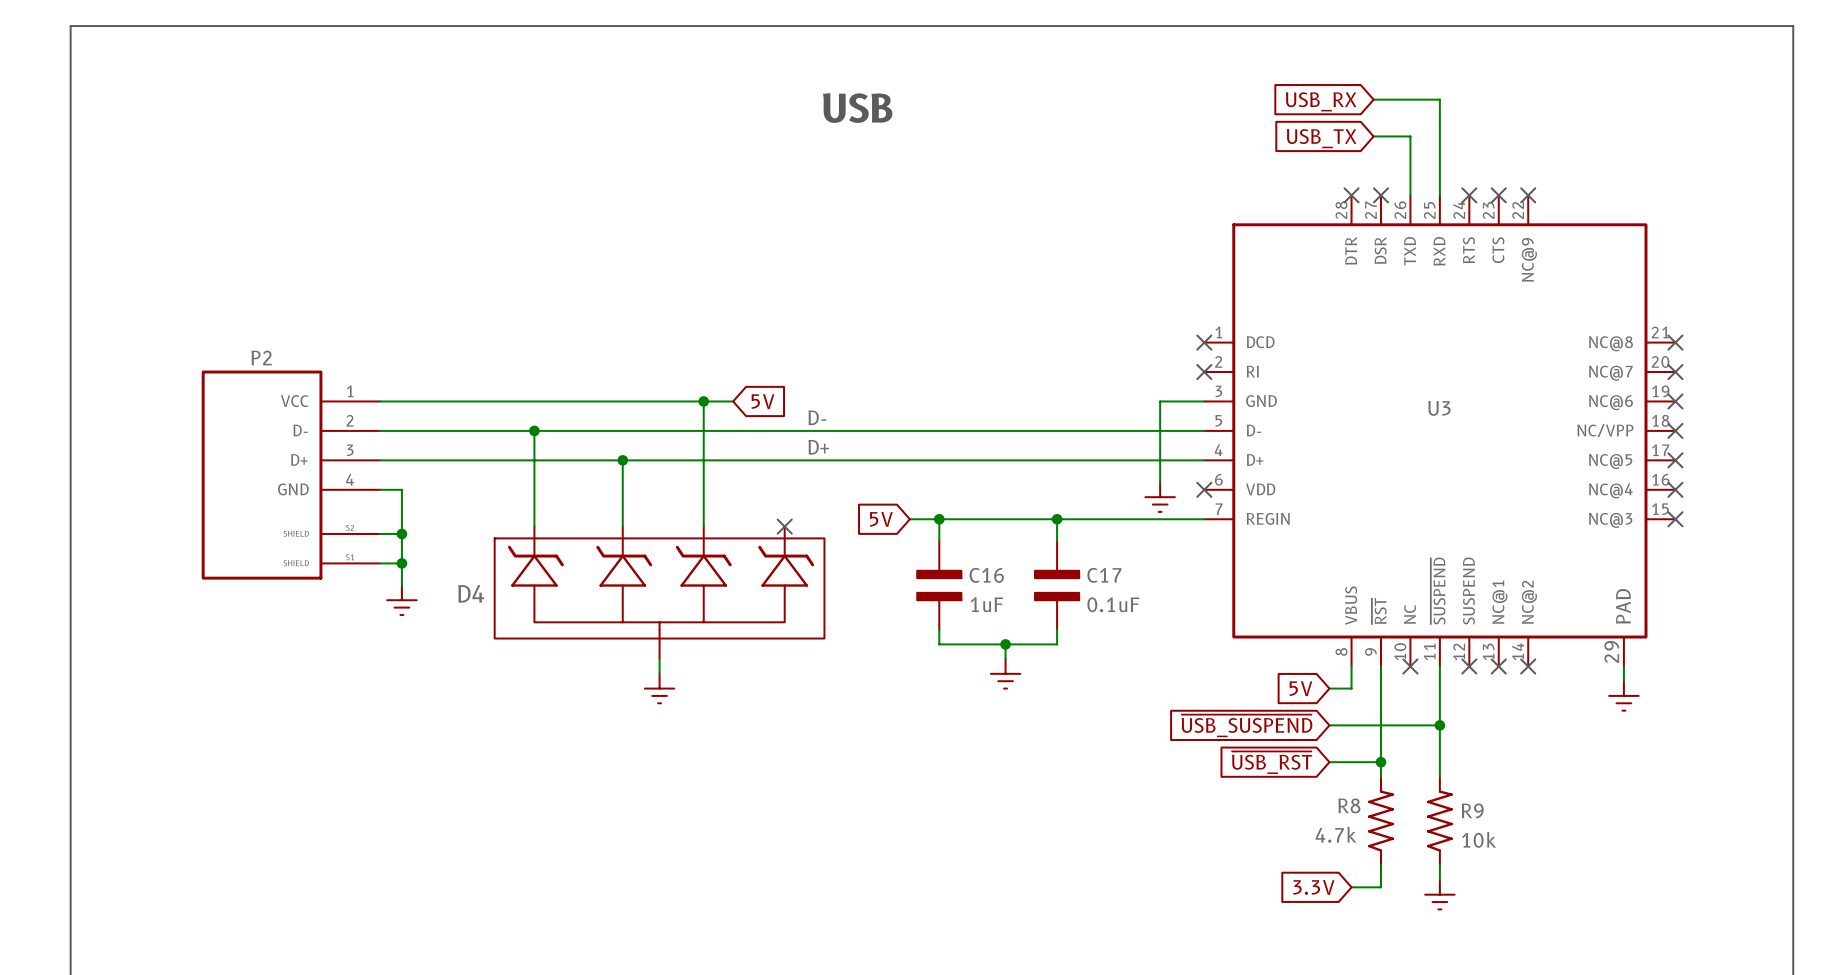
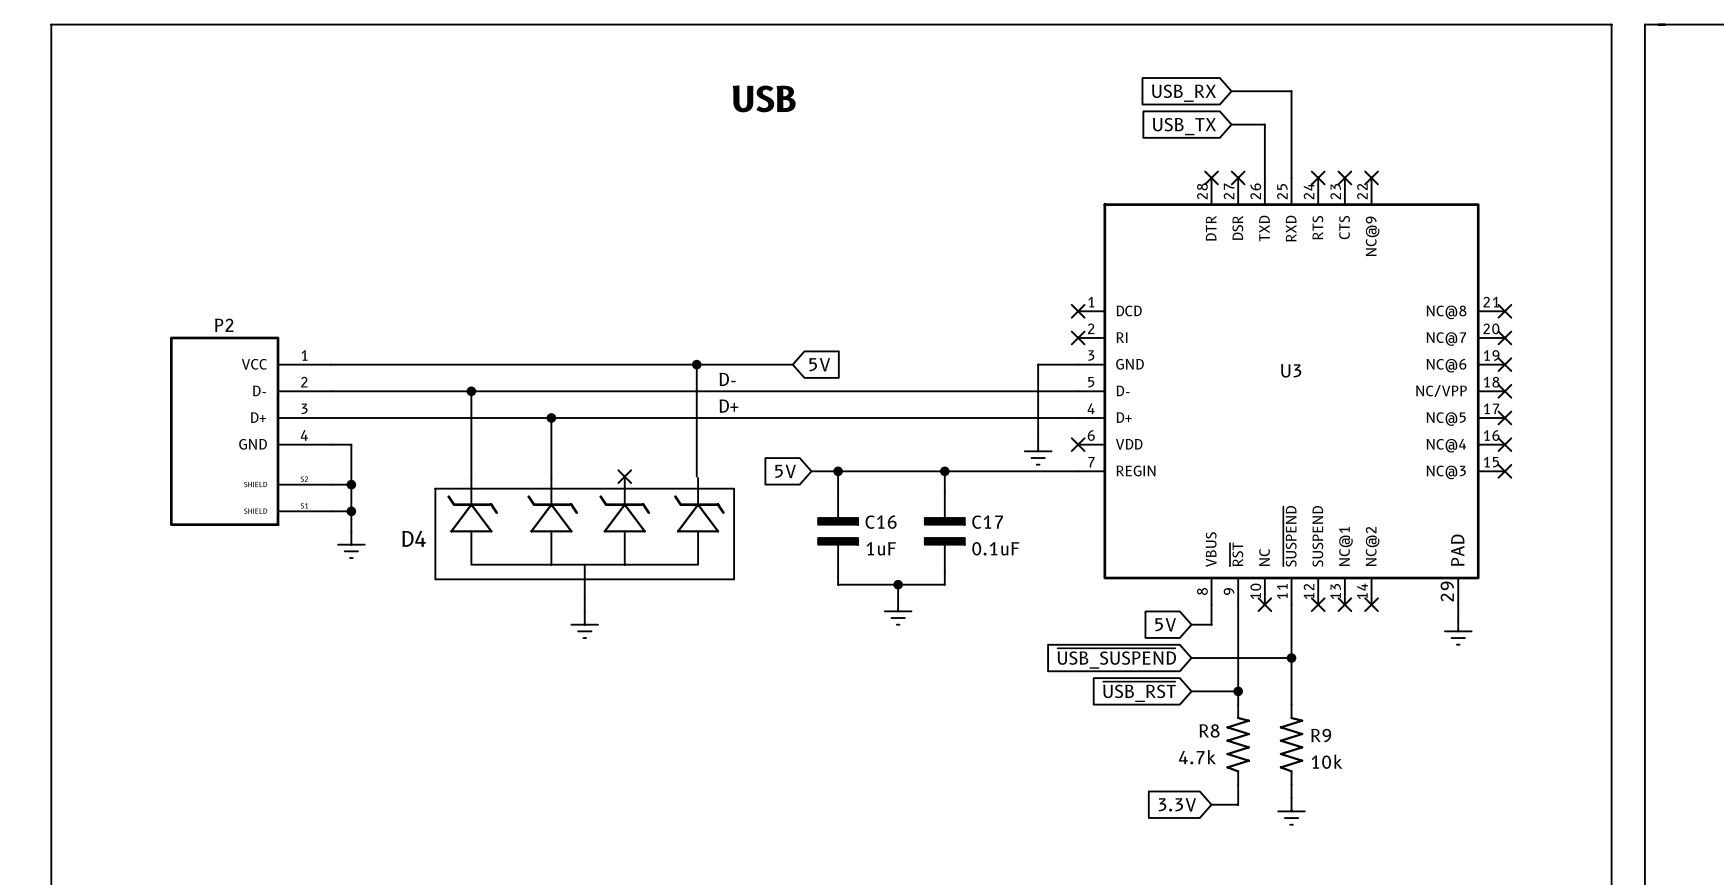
wire: (703, 401) (703, 526) -> none
junction: (703, 401) -> none
wire: none -> (651, 364) (792, 364)
global label position: 5V (763, 401) -> 5V (819, 364)
wire: none -> (696, 364) (696, 476)
junction: none -> (696, 364)
no-connect mark: none -> (624, 476)
no-connect mark: (784, 526) -> none

